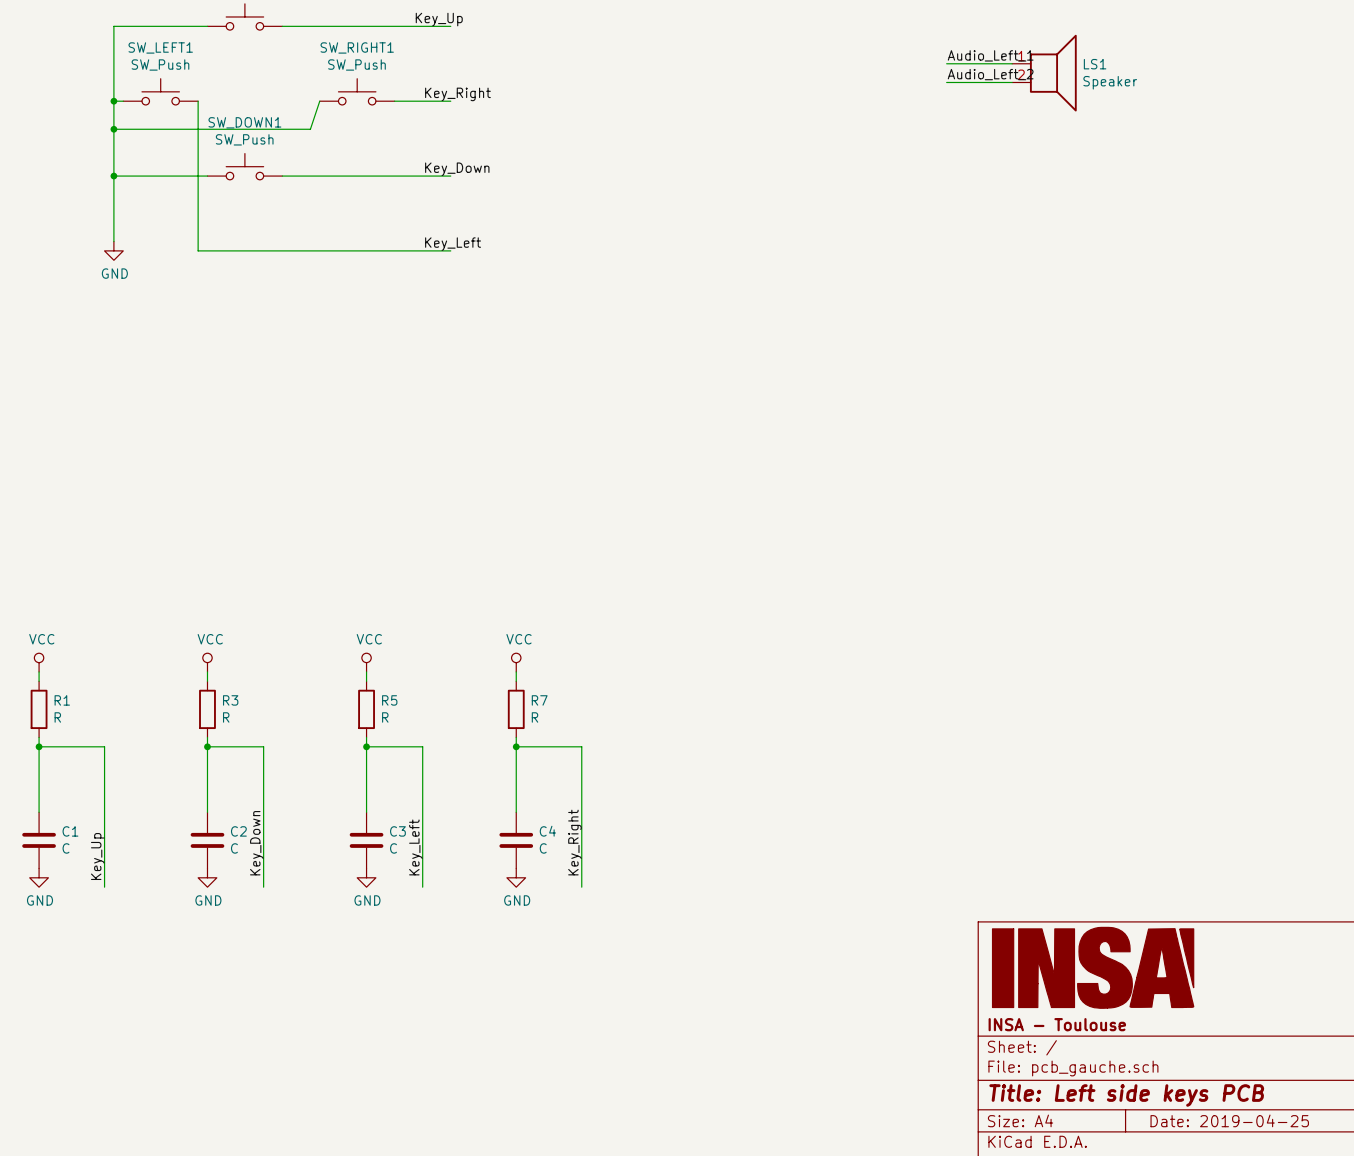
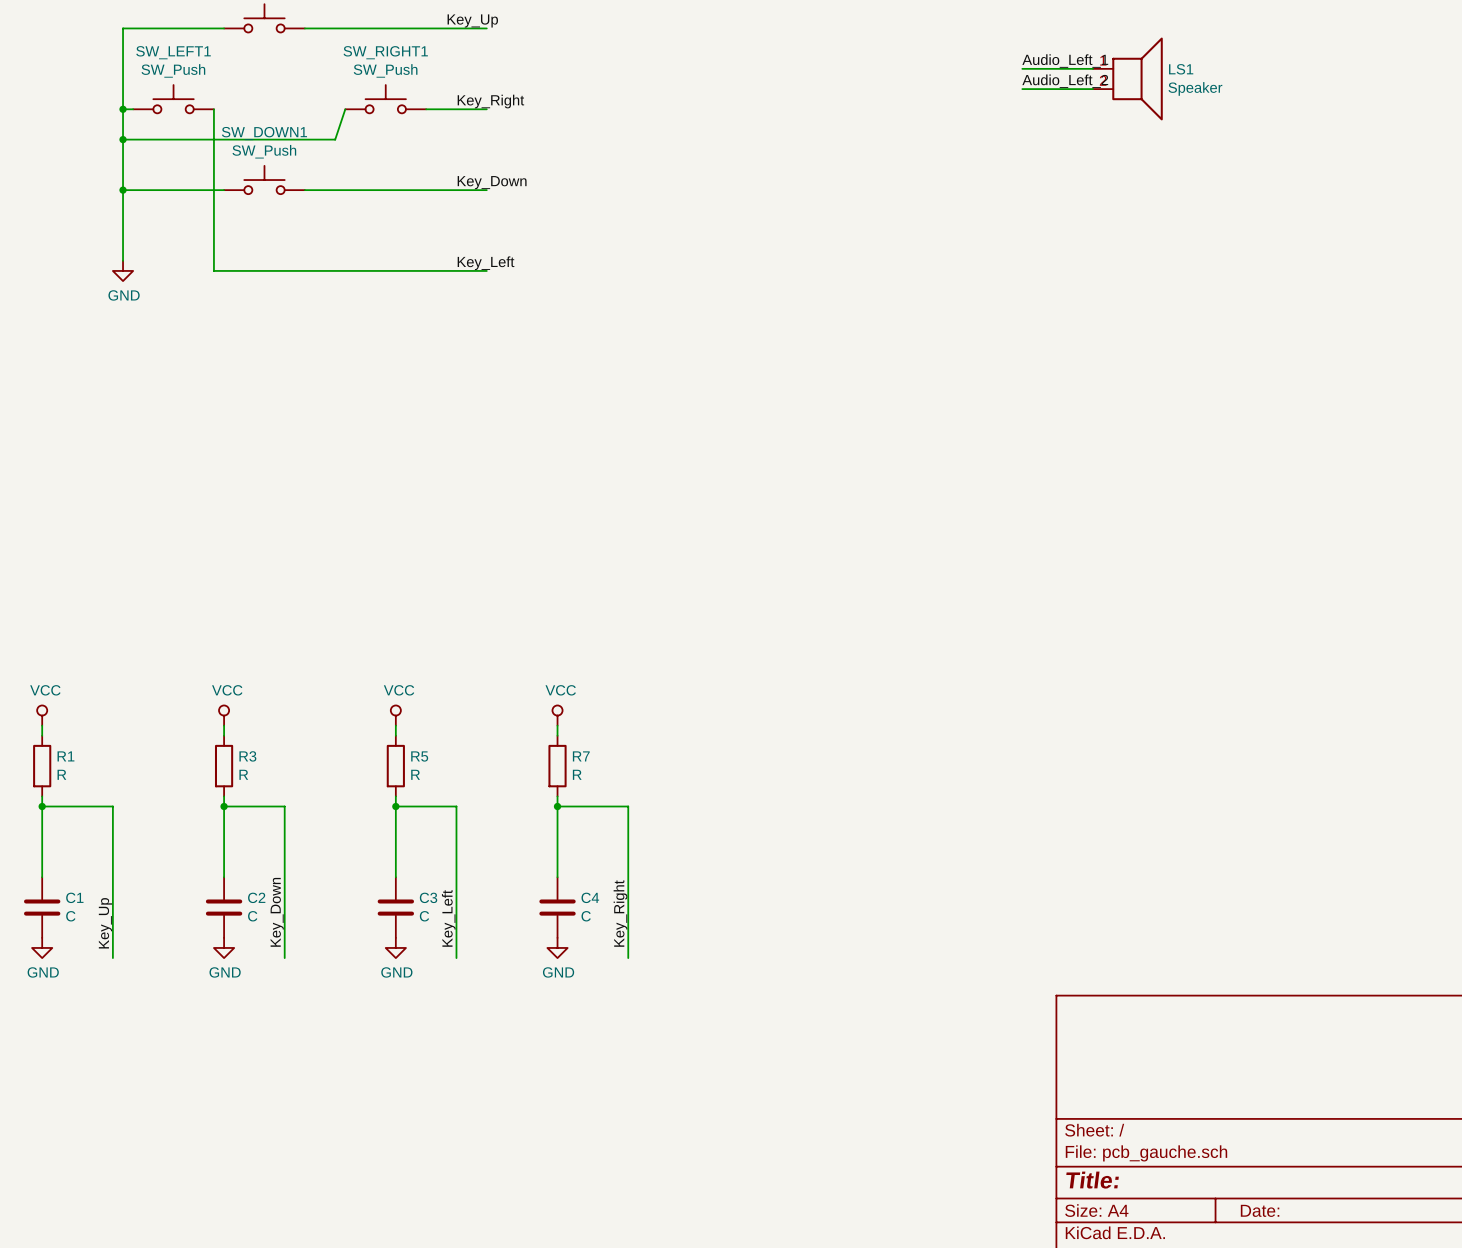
part: (1093, 967) -> none
title block: INSA - Toulouse (1057, 1024) -> none
title block: Title: Left side keys PCB (1126, 1095) -> Title: (1092, 1180)
title block: Date: 2019-04-25 (1229, 1120) -> Date: (1260, 1210)

